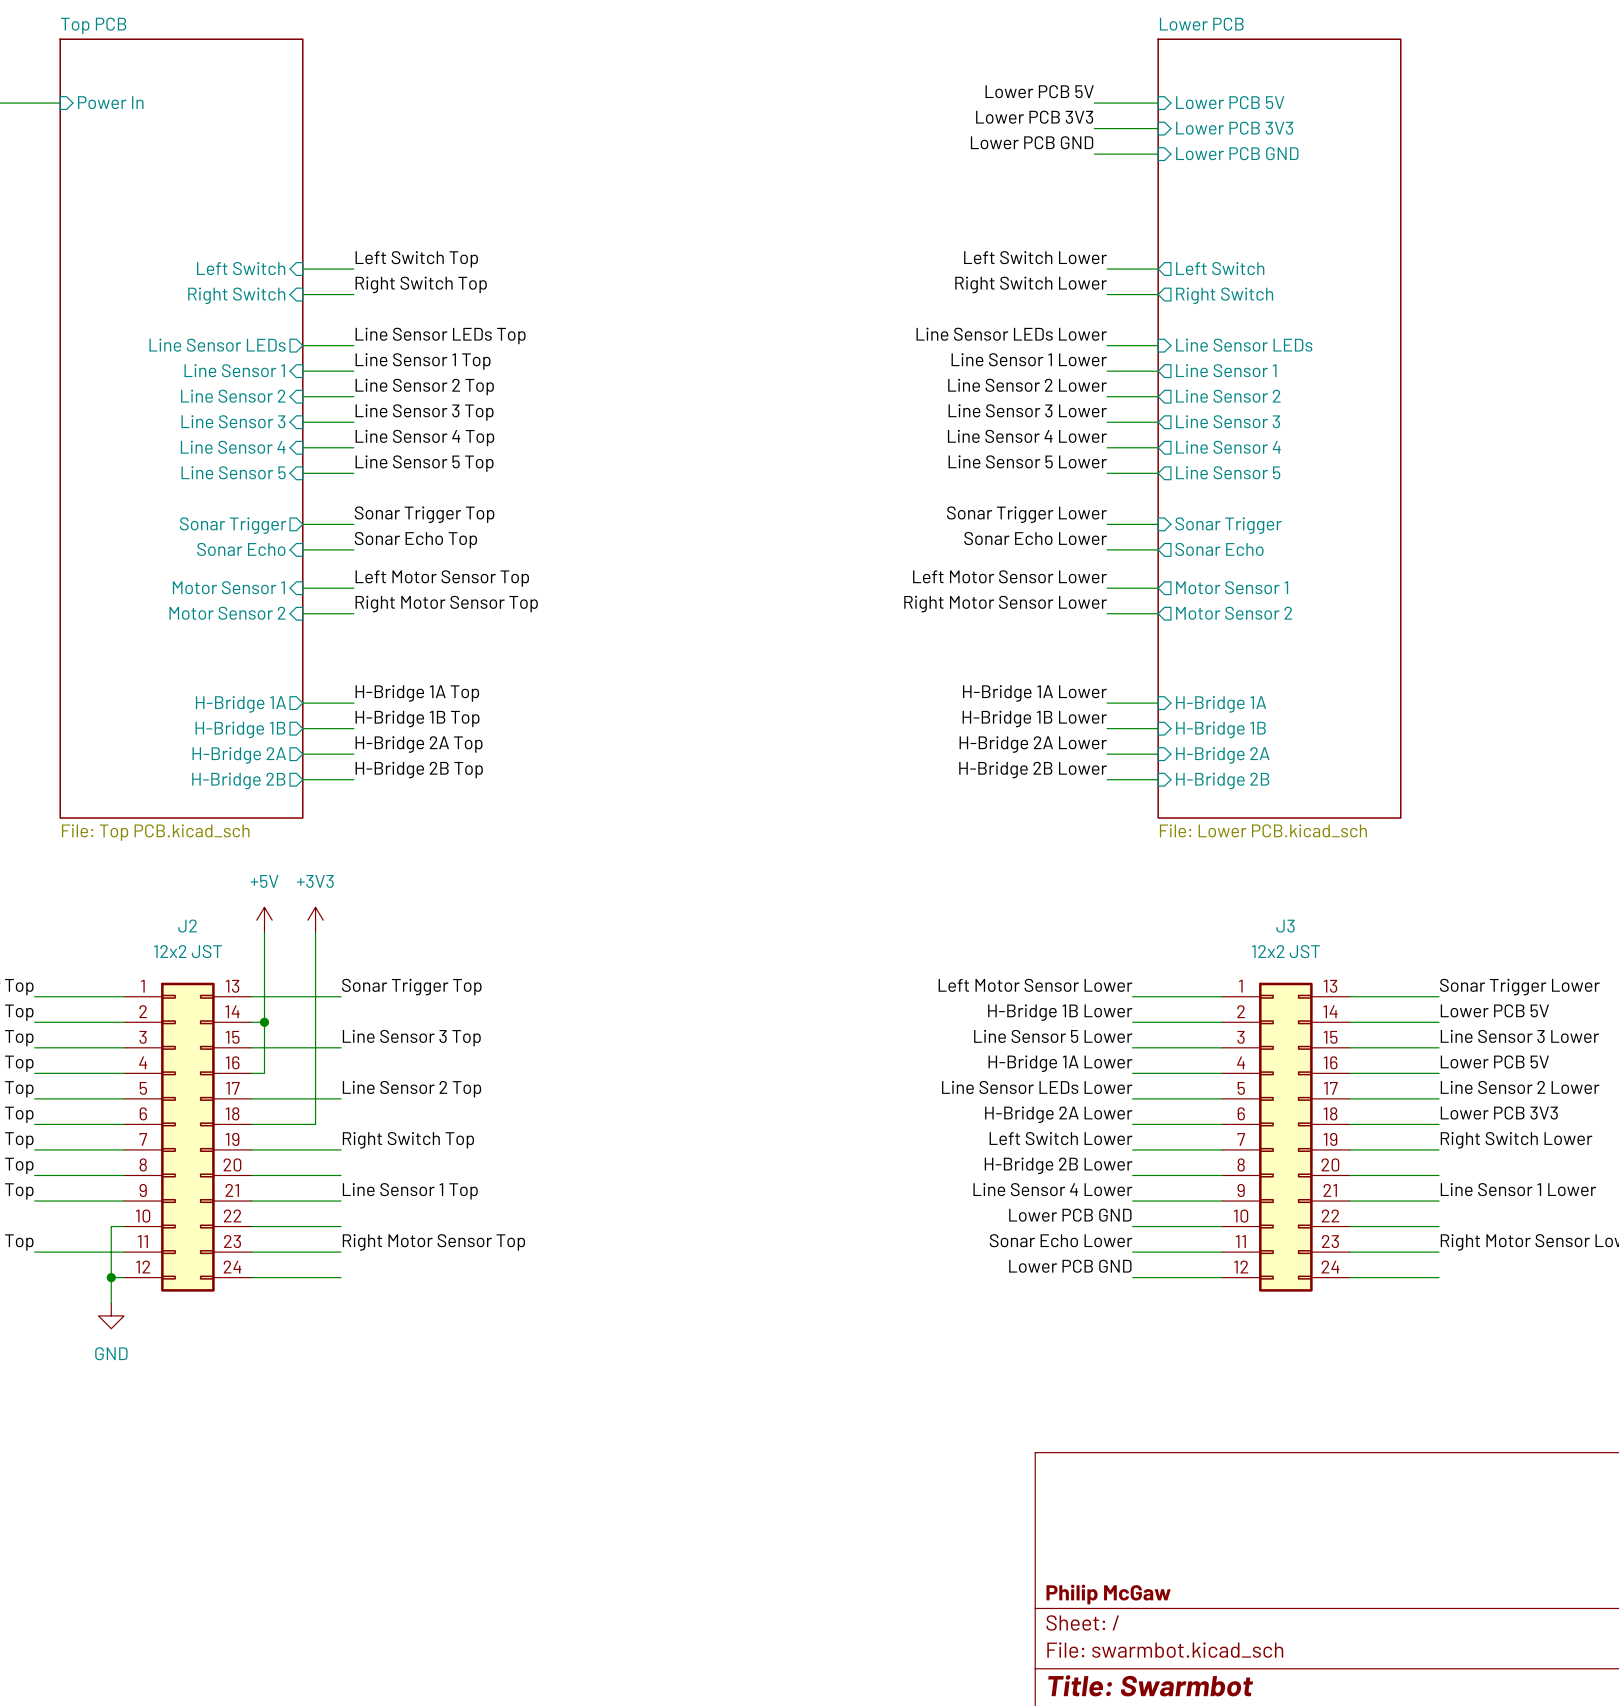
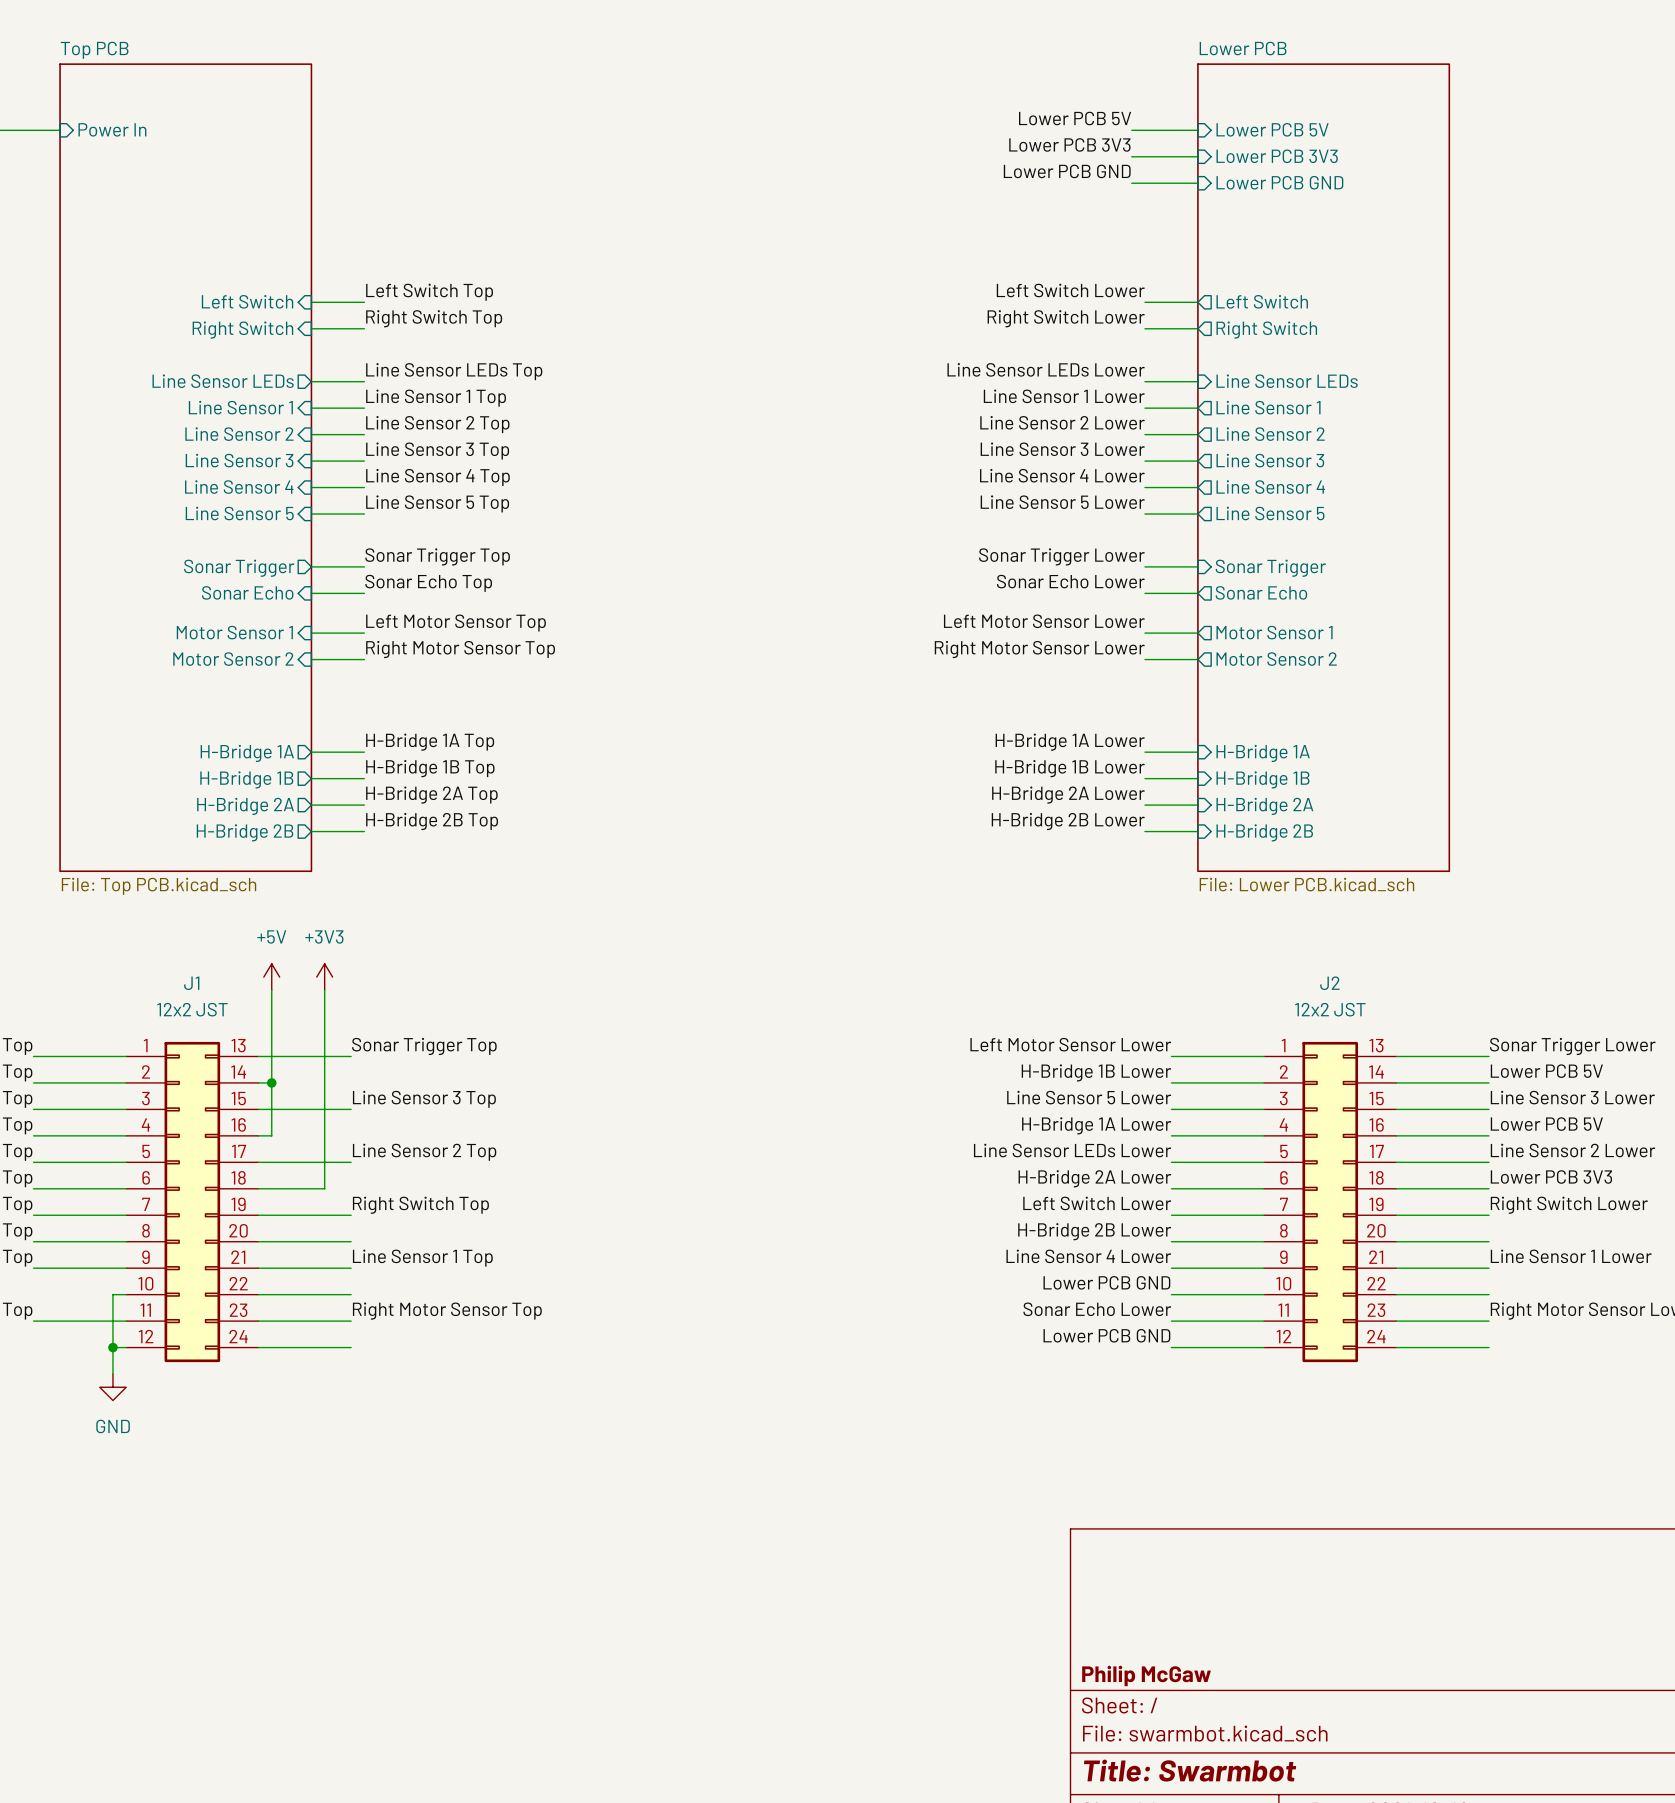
J2 name: J2 (187, 926) -> J1 (191, 983)
J3 name: J3 (1285, 926) -> J2 (1329, 983)

